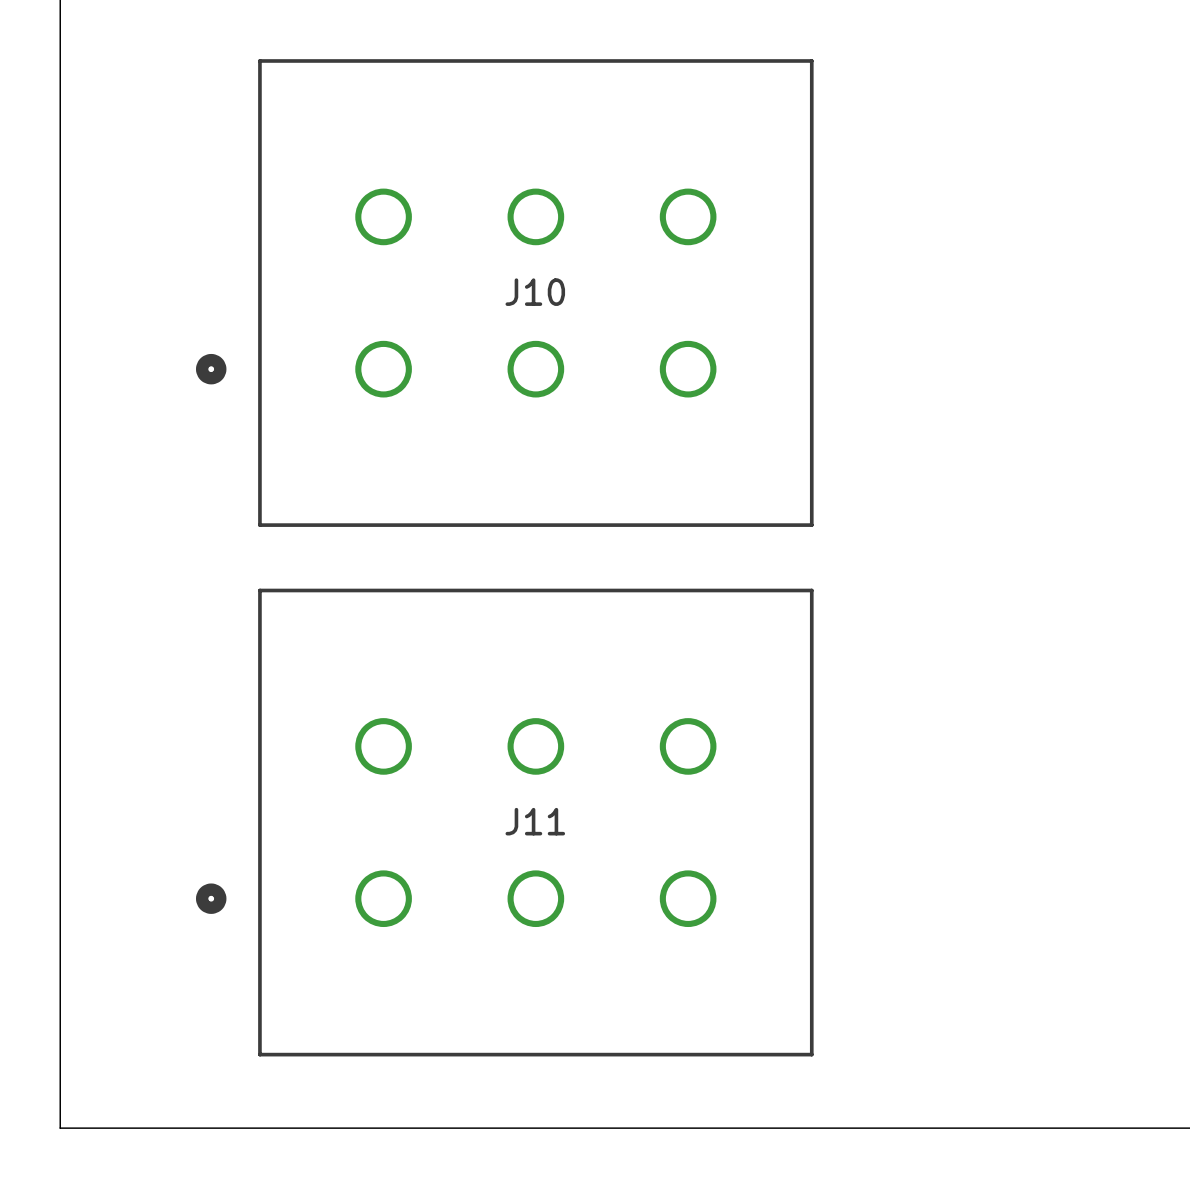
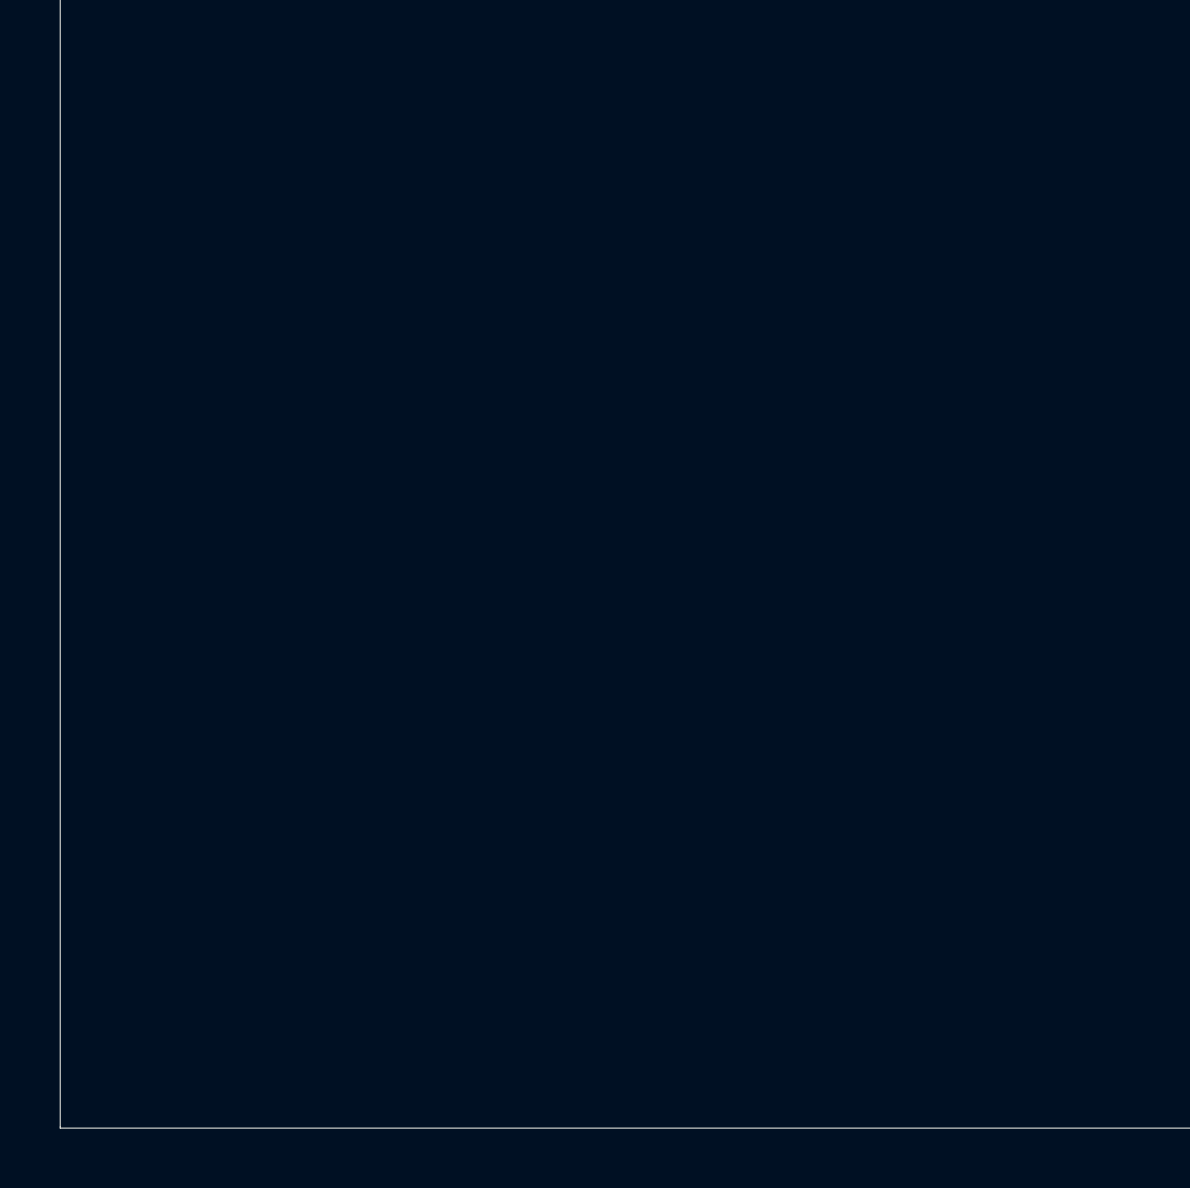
J10: (504, 293) -> none
J11: (504, 822) -> none

